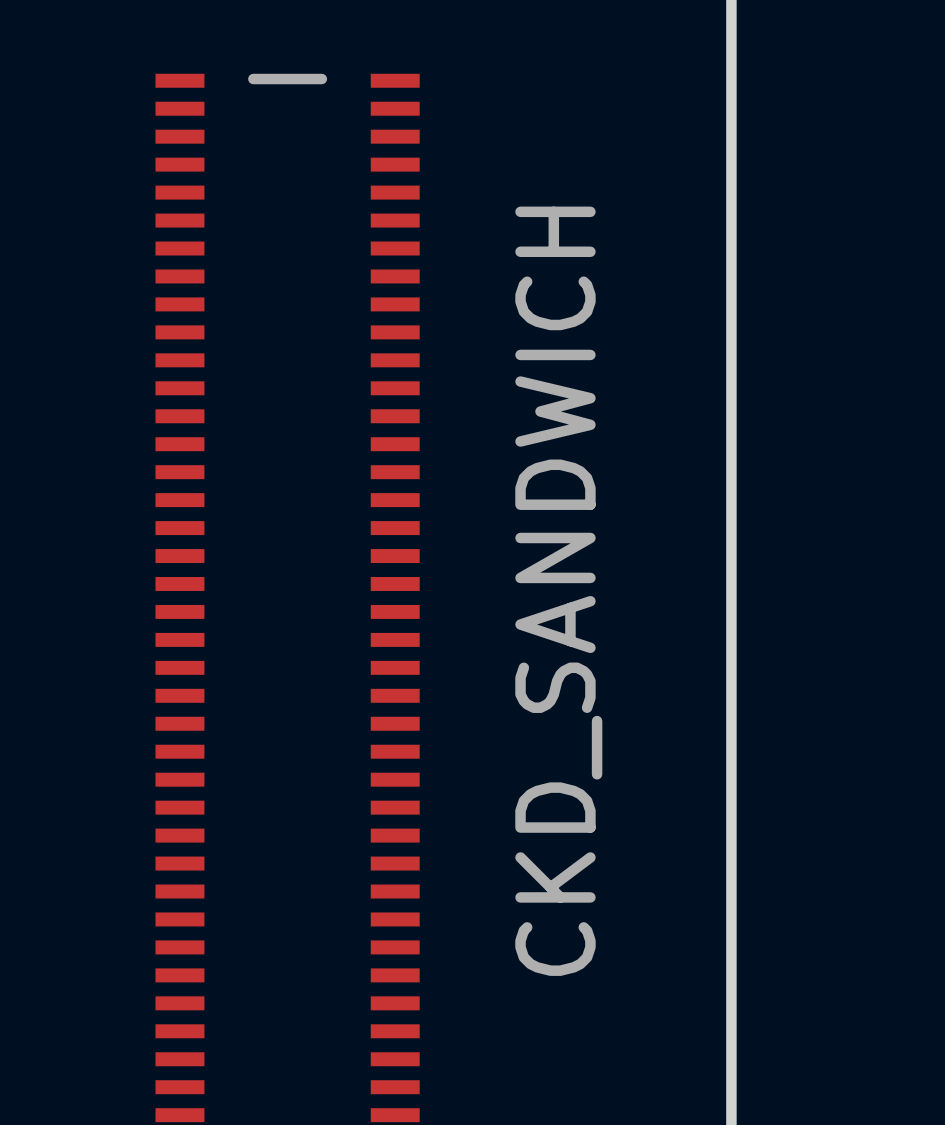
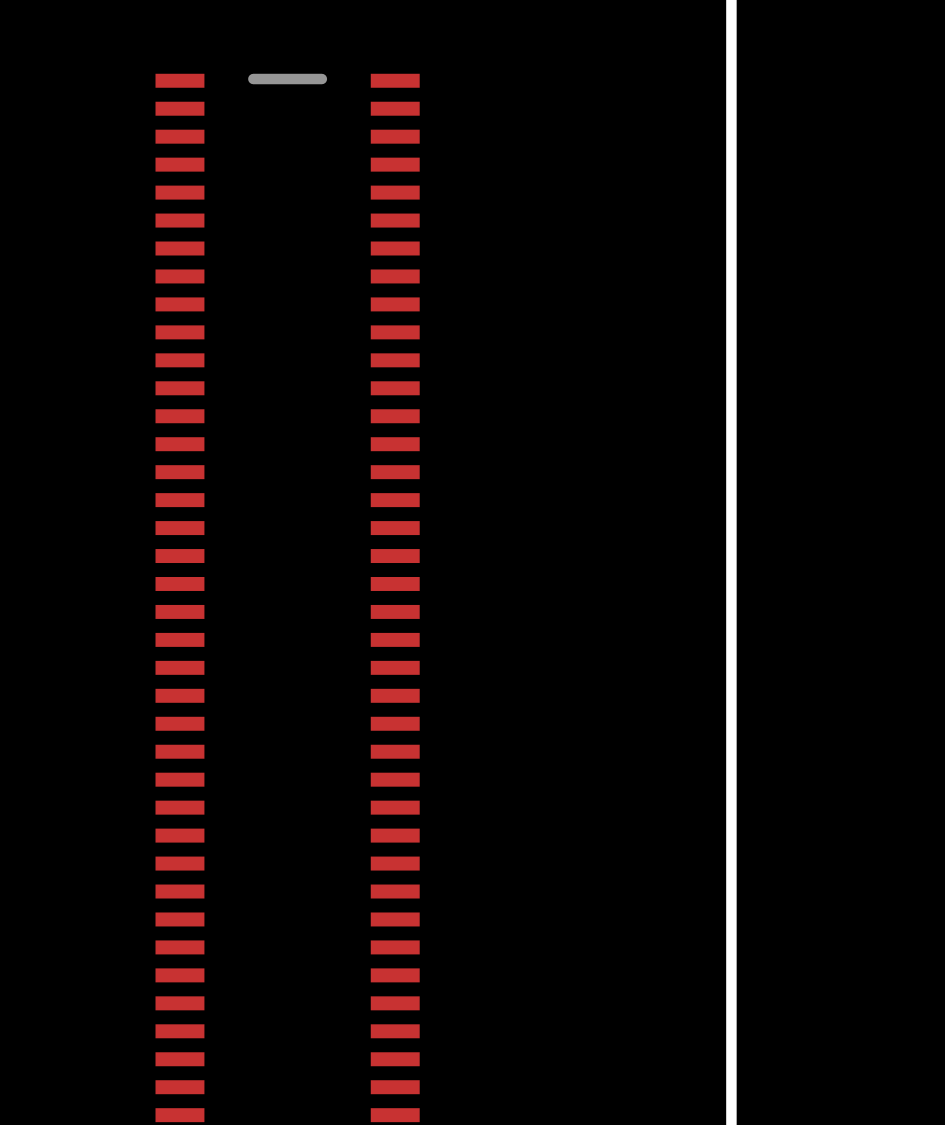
part value: CKD_SANDWICH (558, 591) -> none

